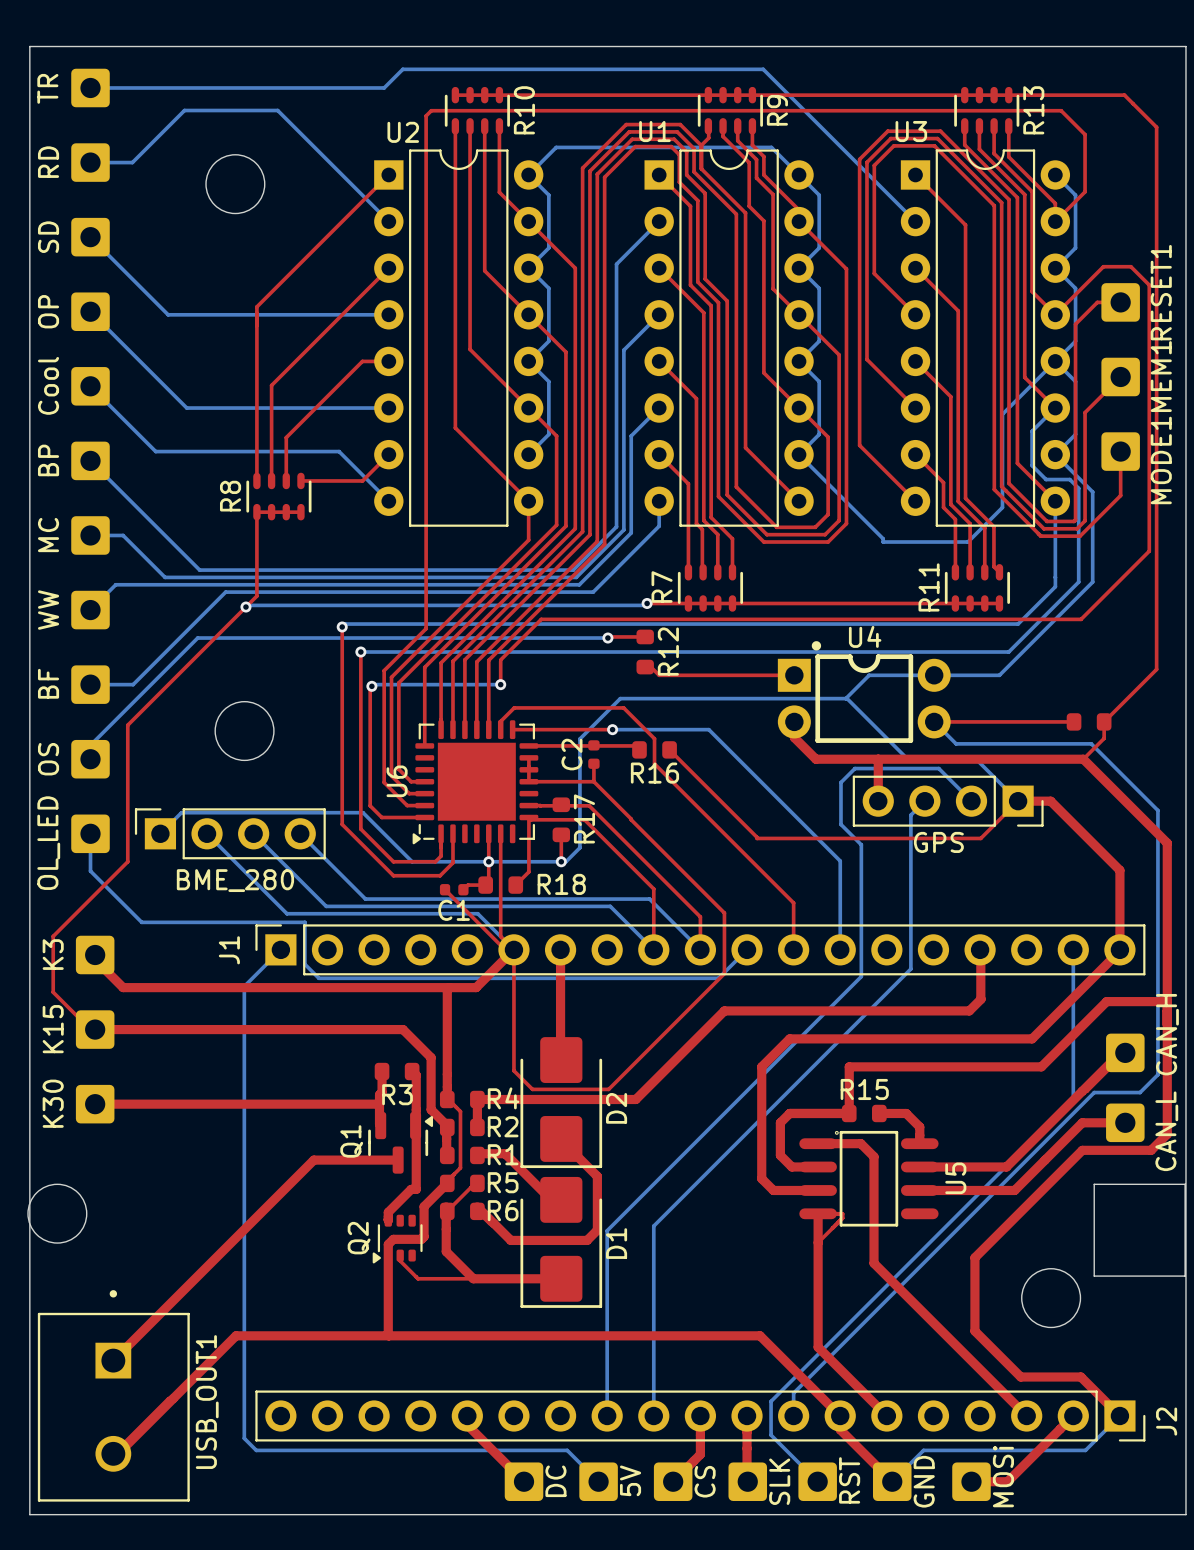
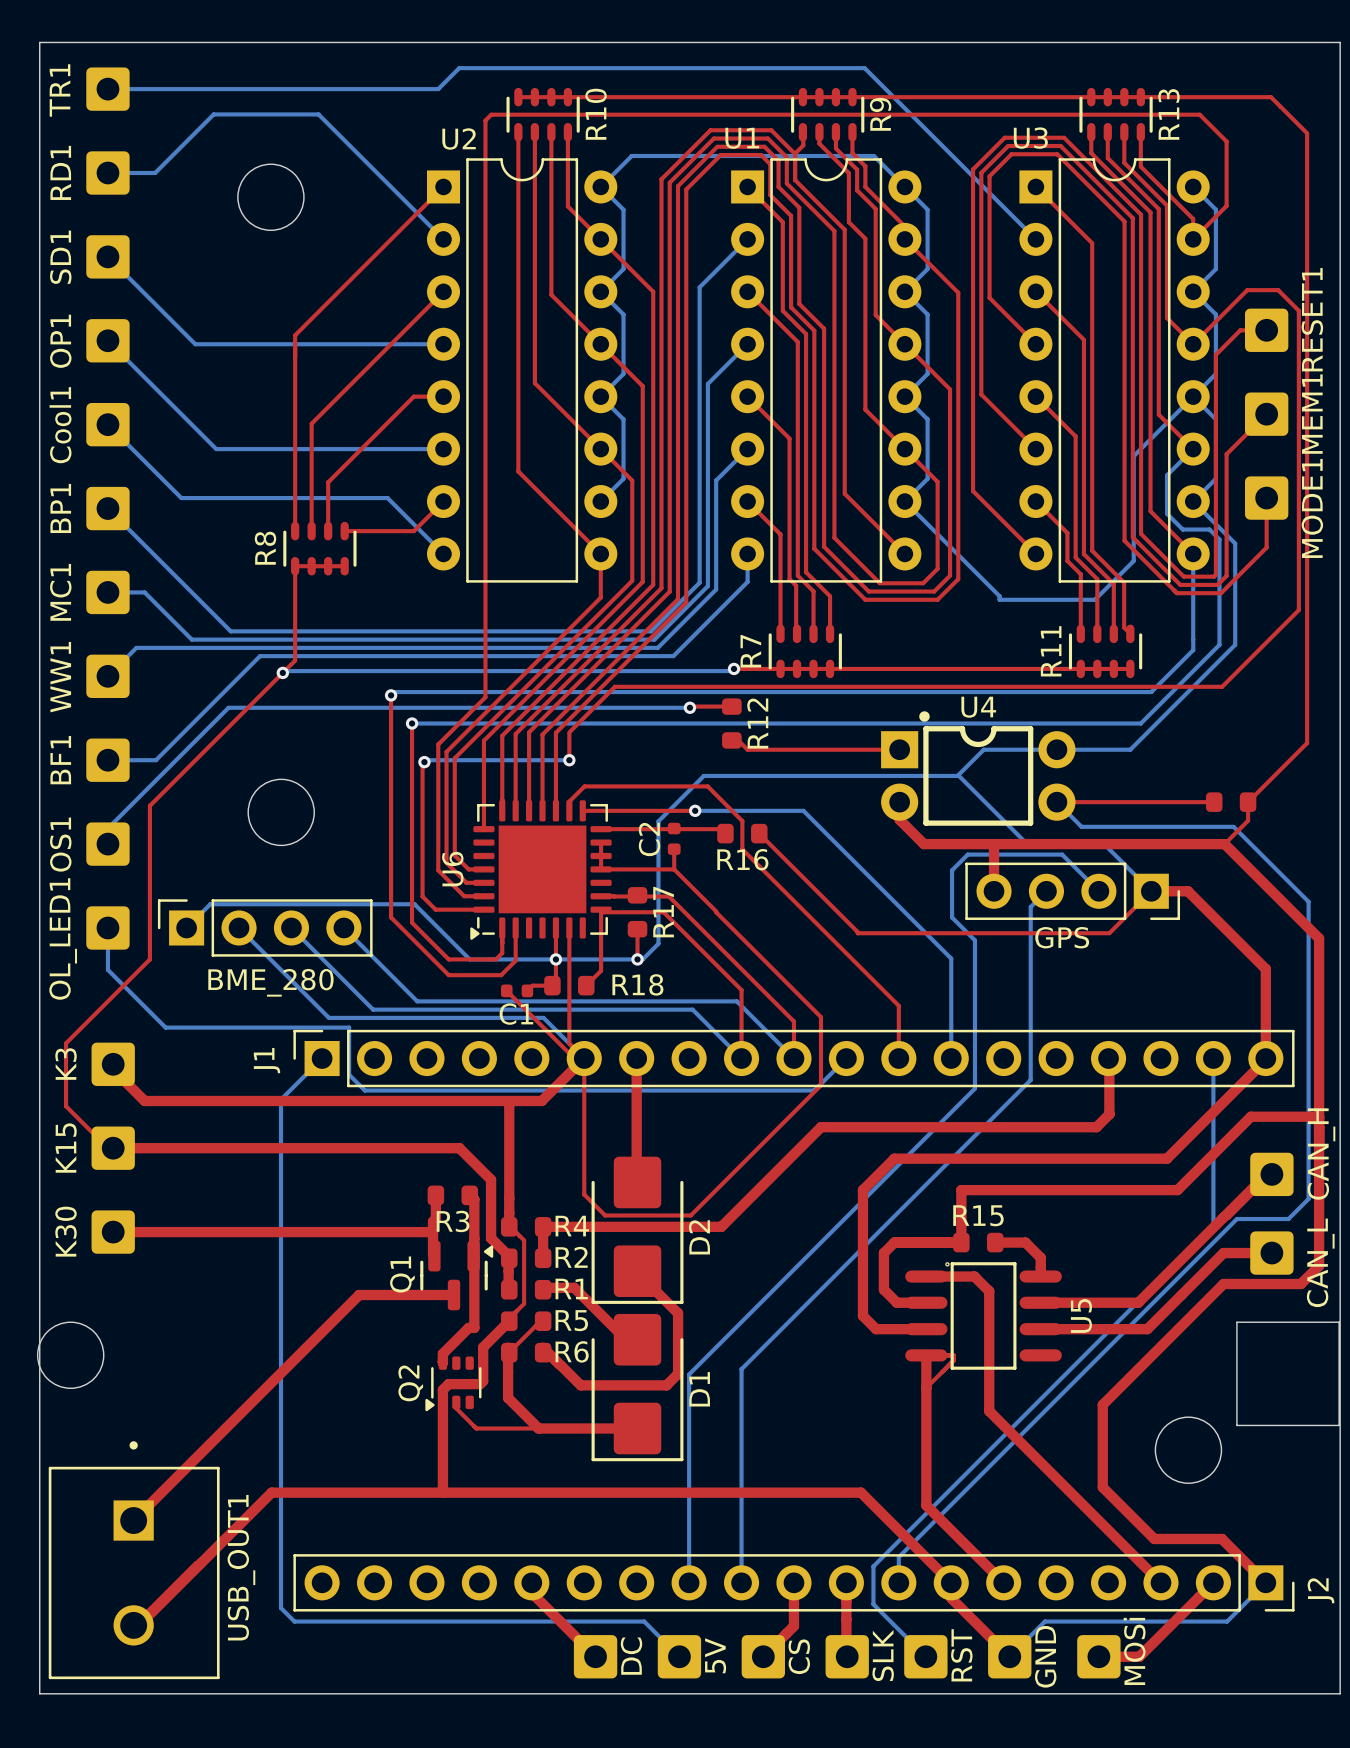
TR name: TR (47, 88) -> TR1 (60, 90)
RD name: RD (48, 162) -> RD1 (60, 172)
SD name: SD (48, 237) -> SD1 (60, 257)
OP name: OP (48, 311) -> OP1 (60, 341)
Cool name: Cool (48, 385) -> Cool1 (60, 425)
BP name: BP (48, 460) -> BP1 (60, 508)
MC name: MC (48, 535) -> MC1 (60, 592)
WW name: WW (48, 610) -> WW1 (60, 677)
BF name: BF (48, 683) -> BF1 (60, 760)
OS name: OS (48, 759) -> OS1 (60, 844)
OL_LED name: OL_LED (48, 843) -> OL_LED1 (63, 938)

